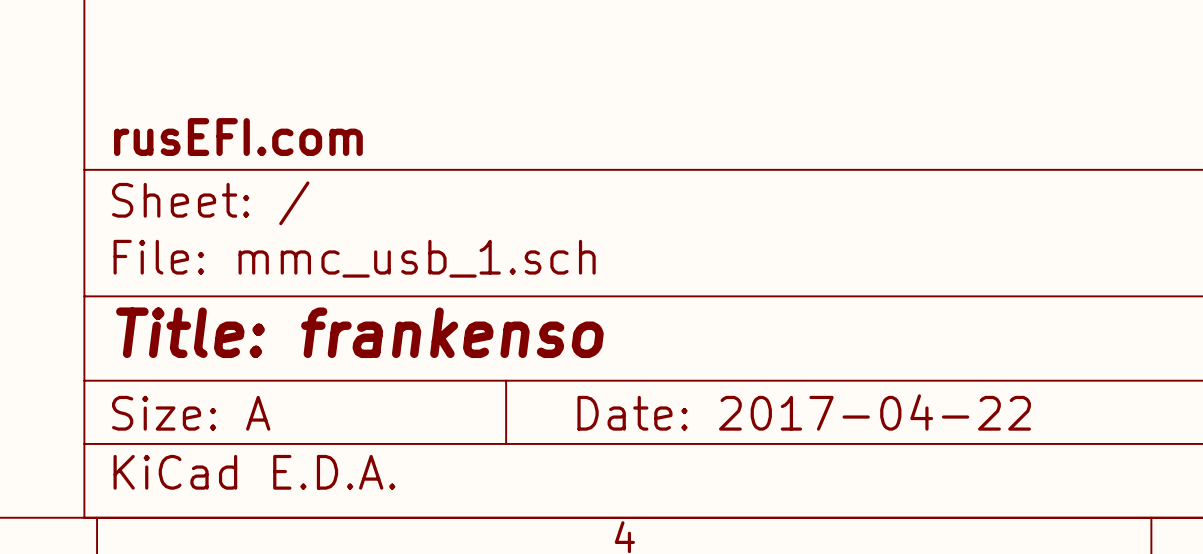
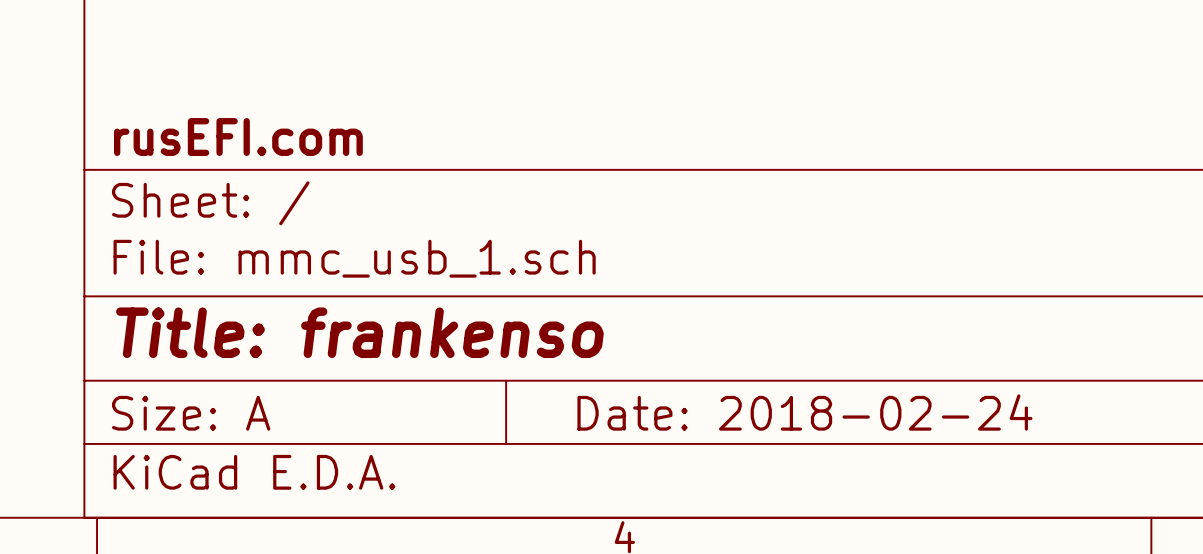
title block: Date: 2017-04-22 (804, 412) -> Date: 2018-02-24 (804, 412)

